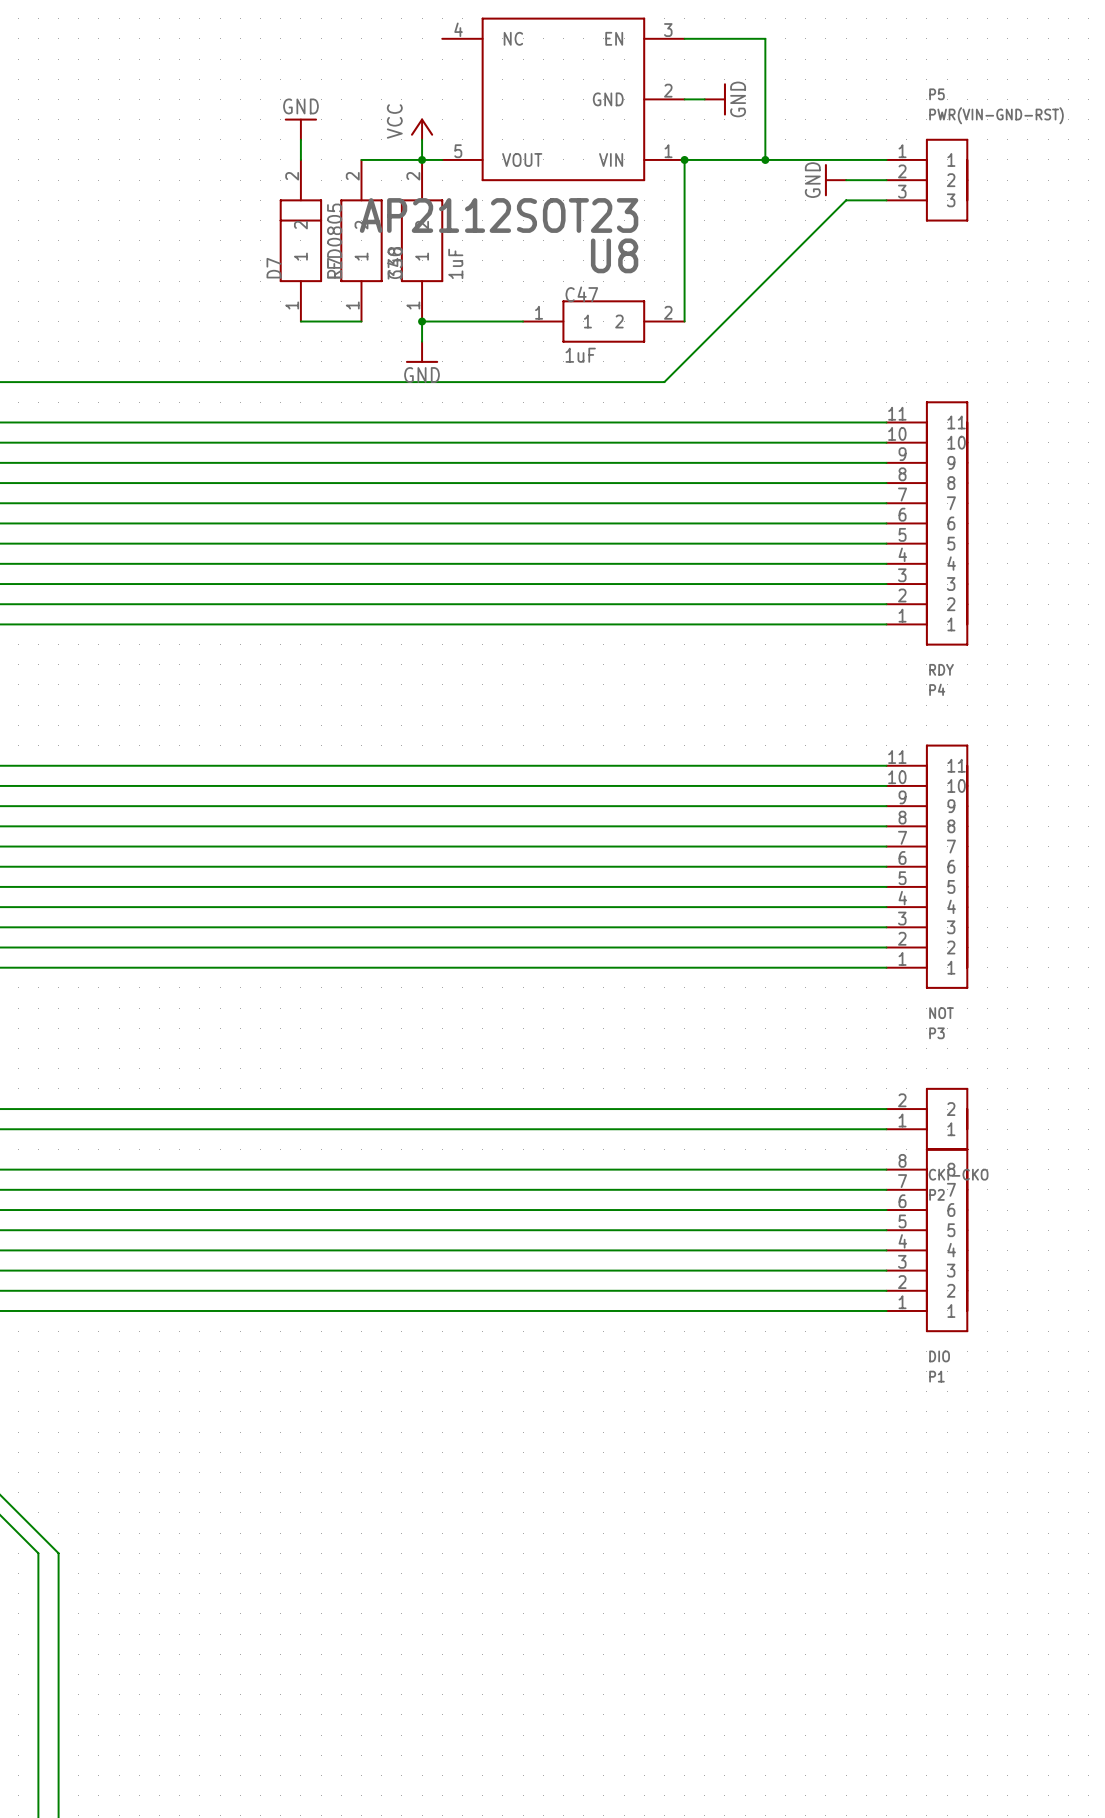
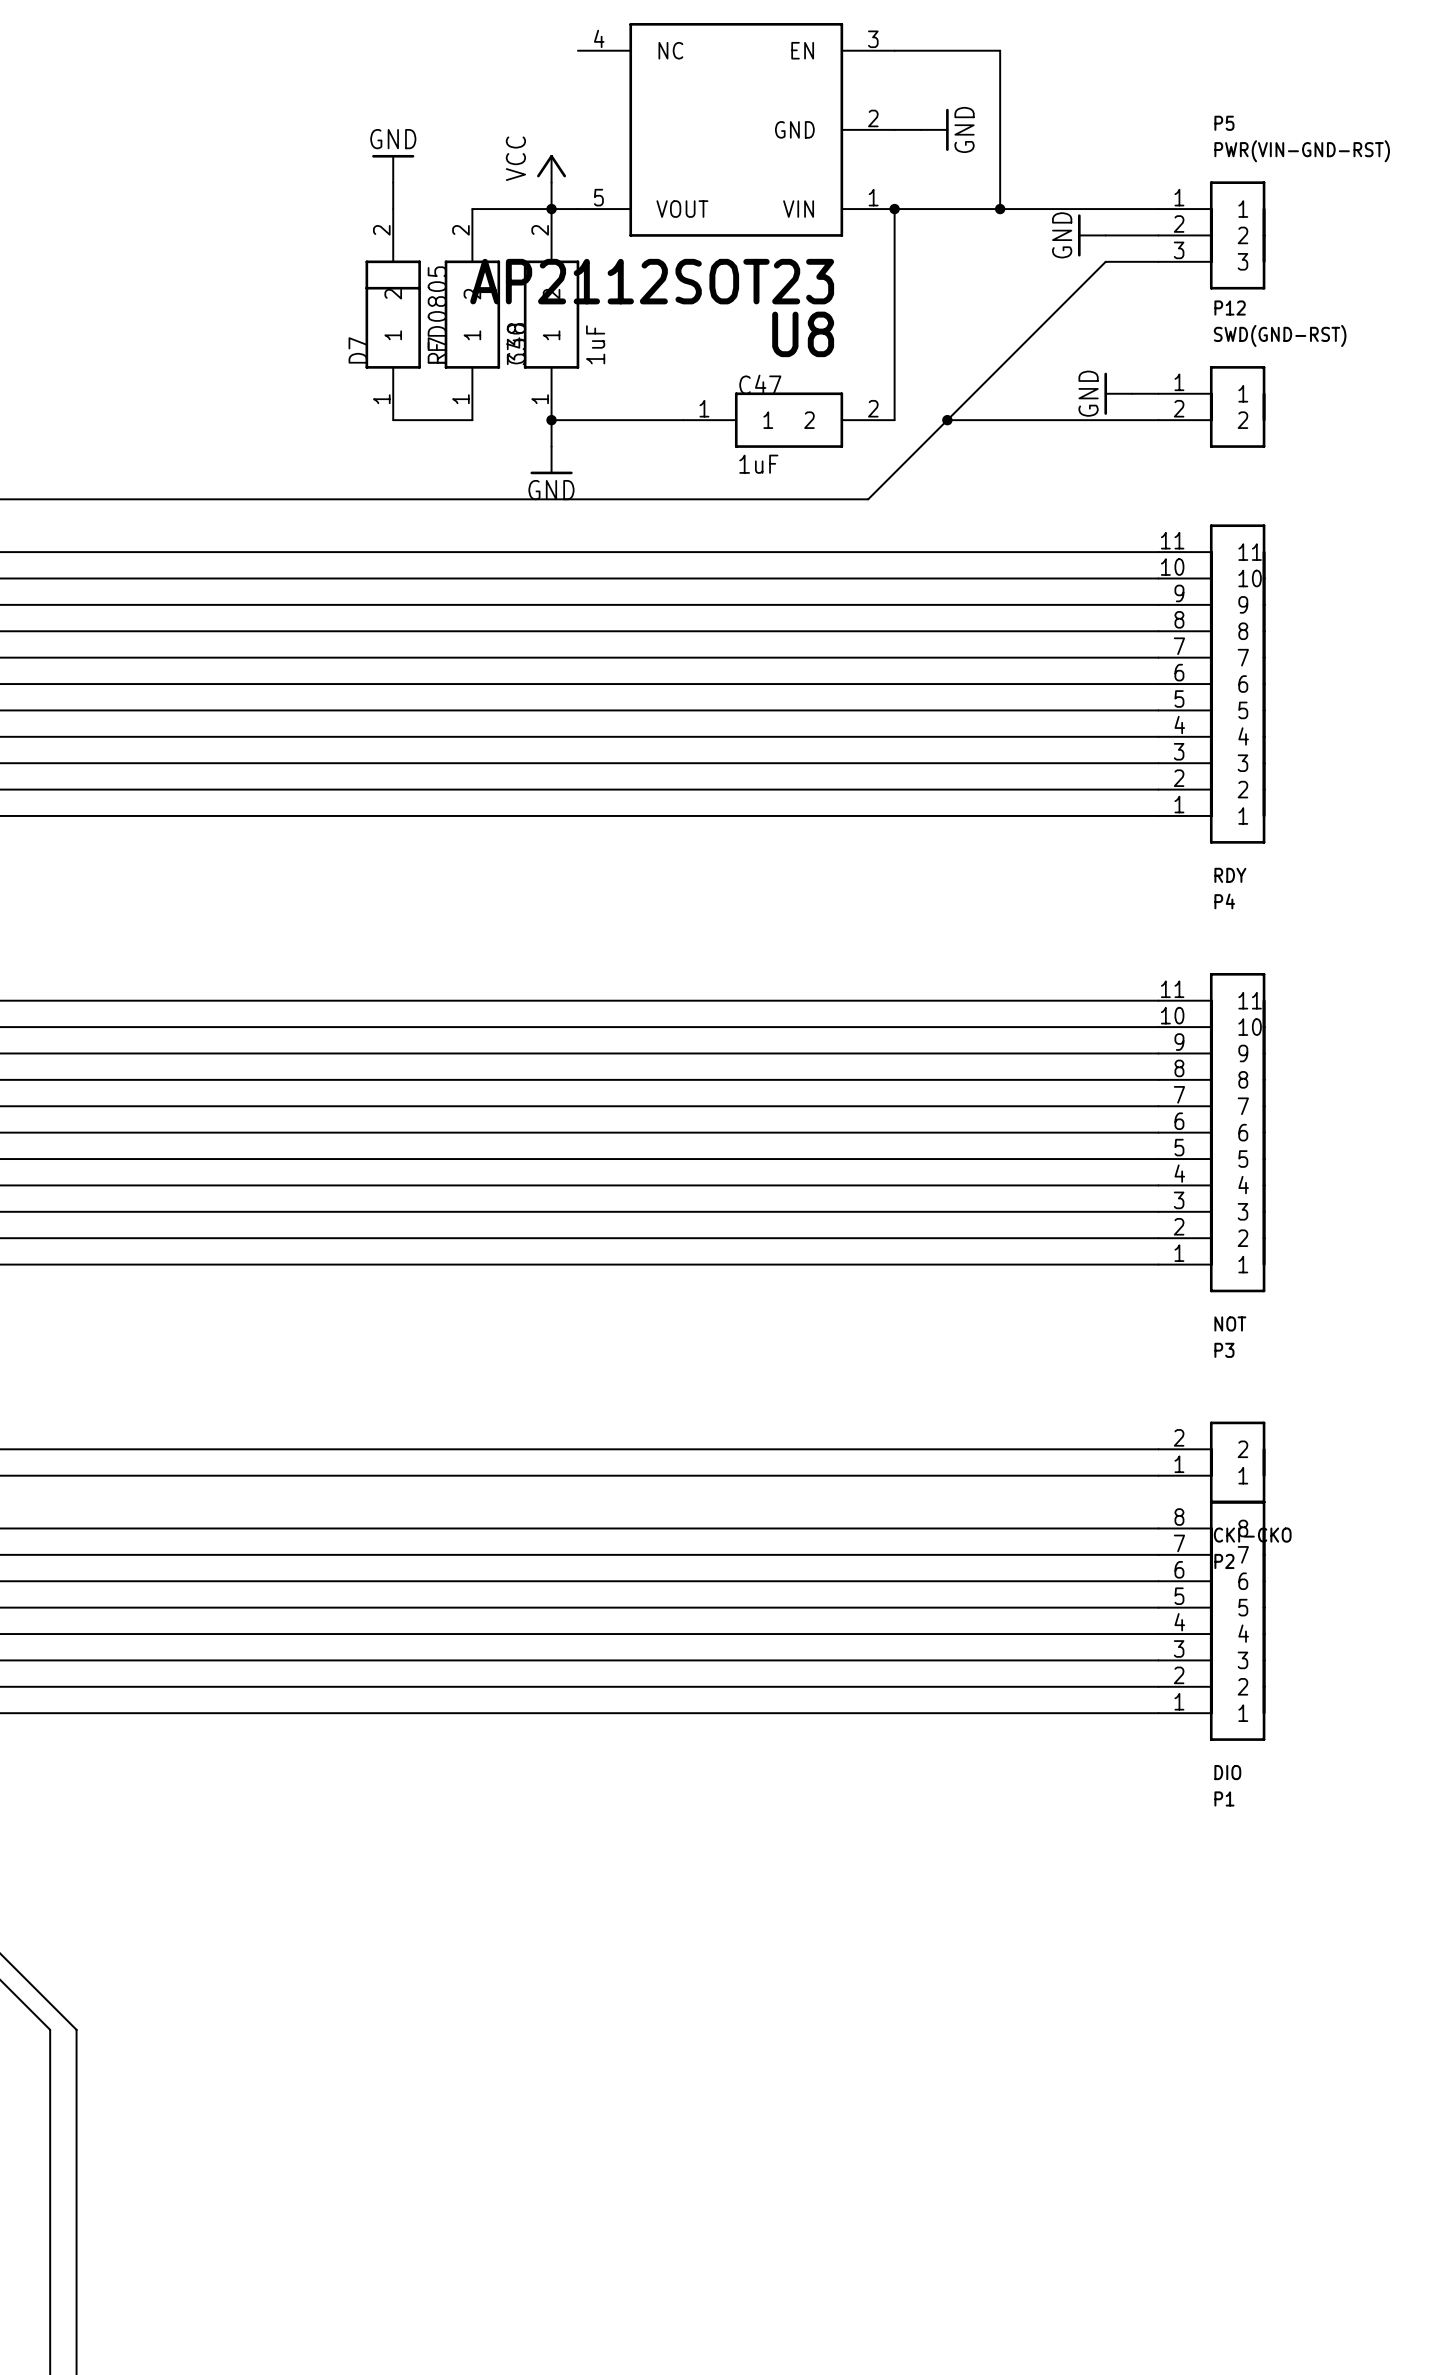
power symbol: none -> GND (1118, 393)
wire: none -> (1132, 393) (1158, 393)
P12: none -> SWD(GND-RST) (1211, 406)
wire: none -> (947, 420) (1158, 420)
junction: none -> (947, 420)

